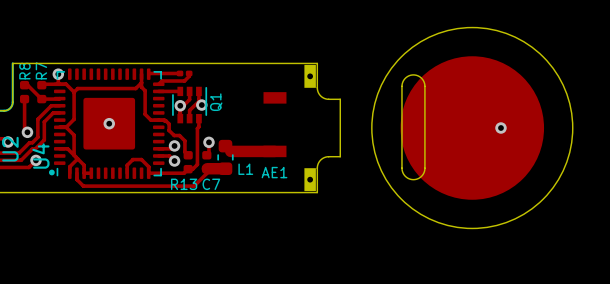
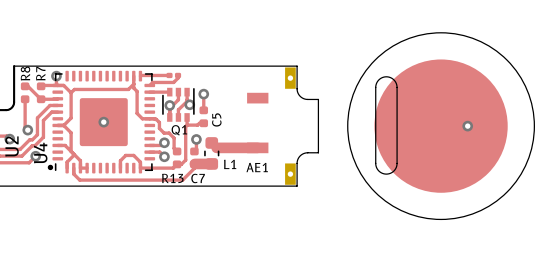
track: none -> (203, 94) (203, 110)
via: none -> (203, 94)
Q1 name rotation: 0° (216, 102) -> 90° clockwise (179, 130)
Q1 name position: Q1 (216, 102) -> Q1 (179, 130)
C5: none -> (203, 116)
track: none -> (203, 123) (187, 125)

